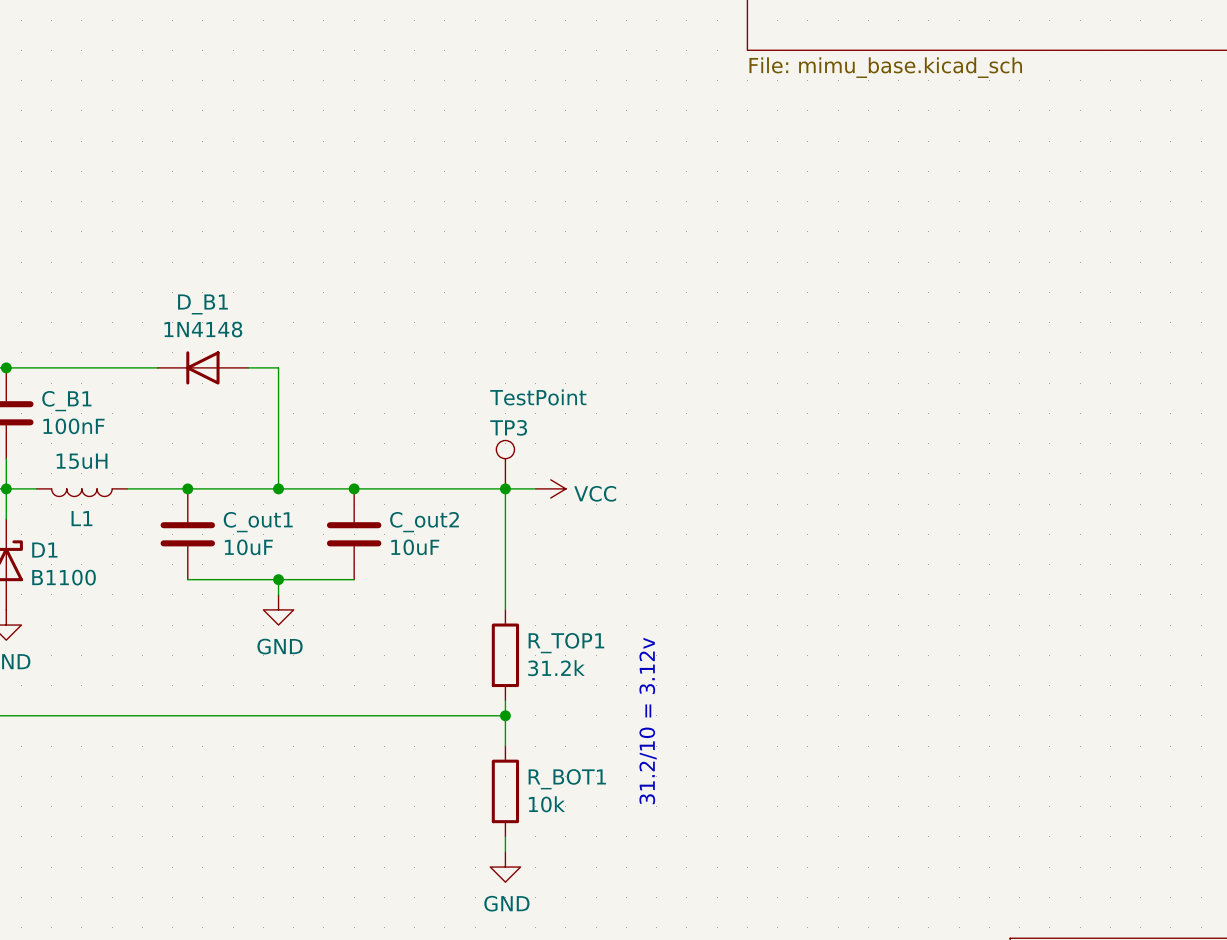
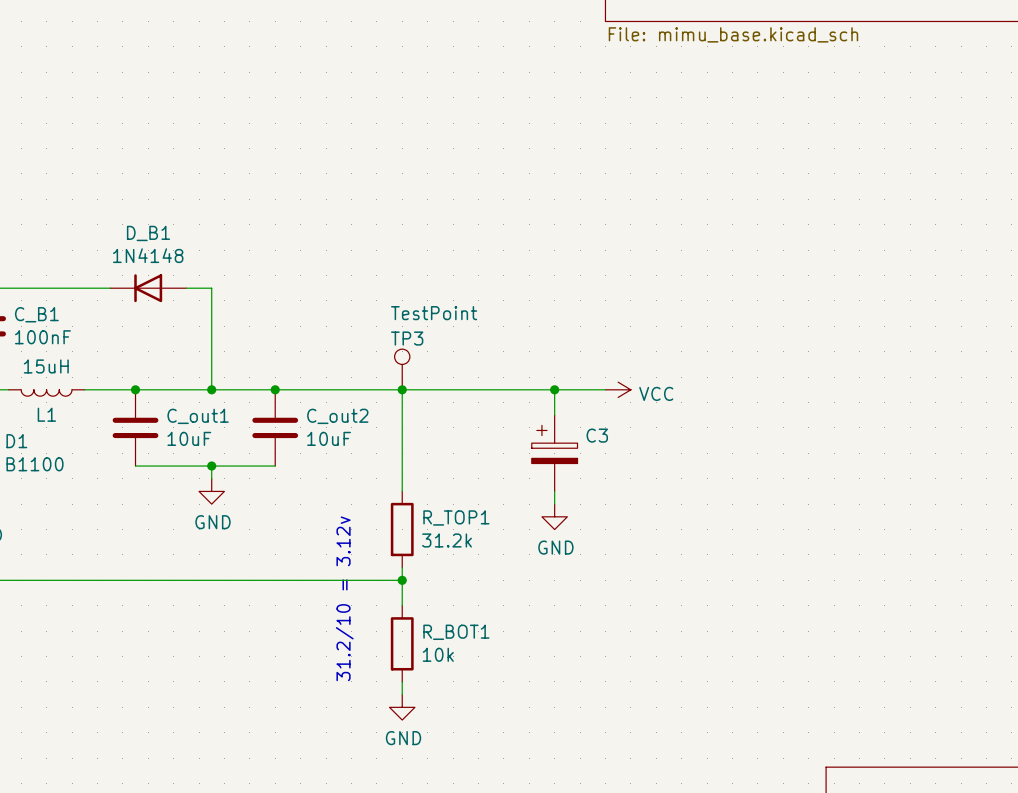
wire: none -> (427, 389) (605, 389)
power symbol position: VCC (550, 488) -> VCC (618, 389)
wire: none -> (554, 389) (554, 415)
junction: none -> (554, 389)
C3: none -> (554, 453)
wire: none -> (554, 491) (554, 504)
power symbol: none -> GND (554, 516)
text position: 31.2/10 = 3.12v (648, 721) -> 31.2/10 = 3.12v (344, 598)

